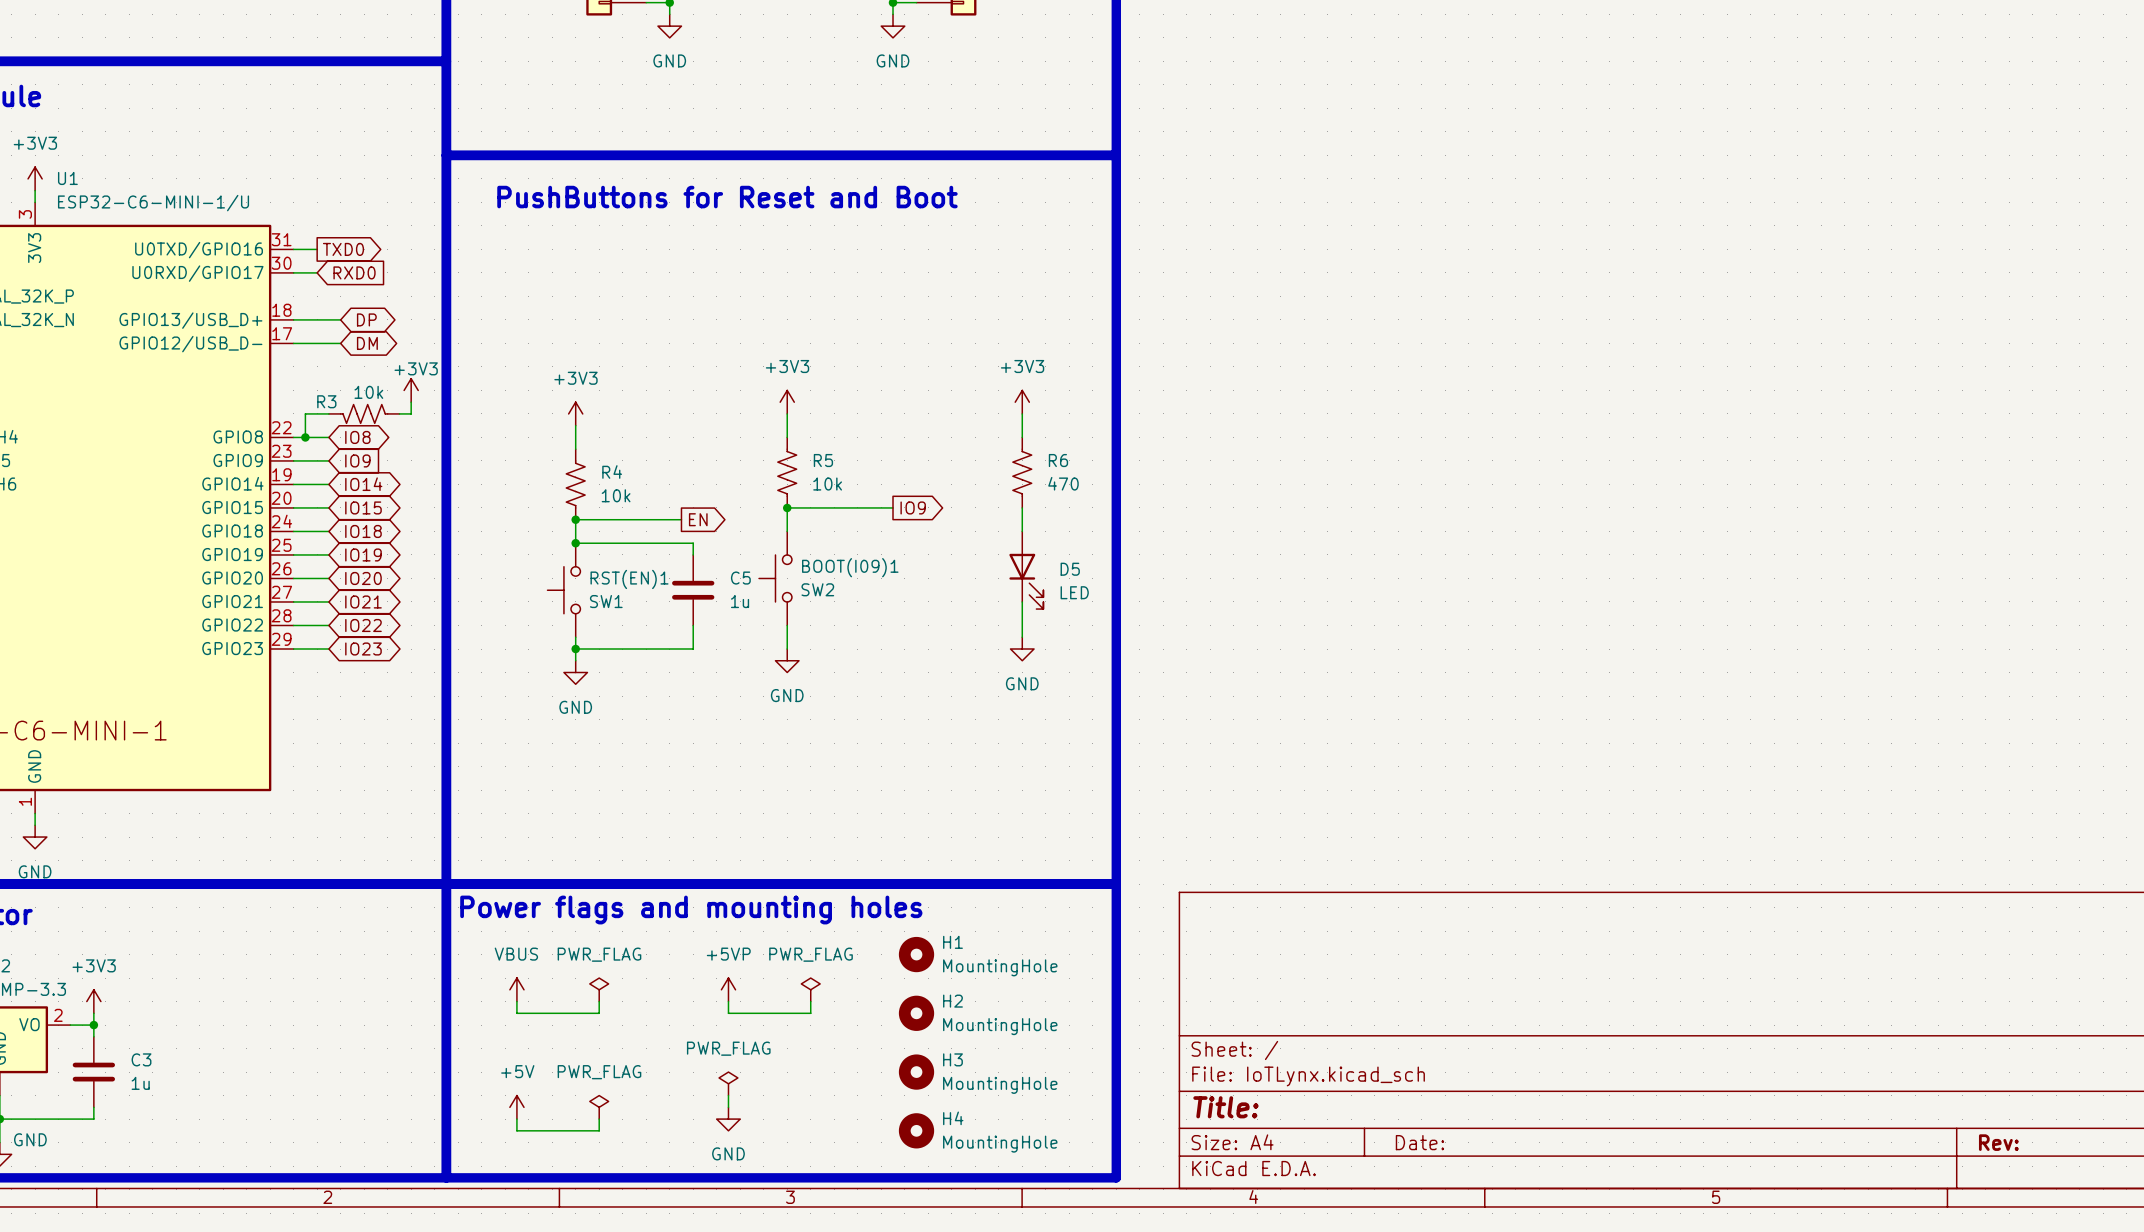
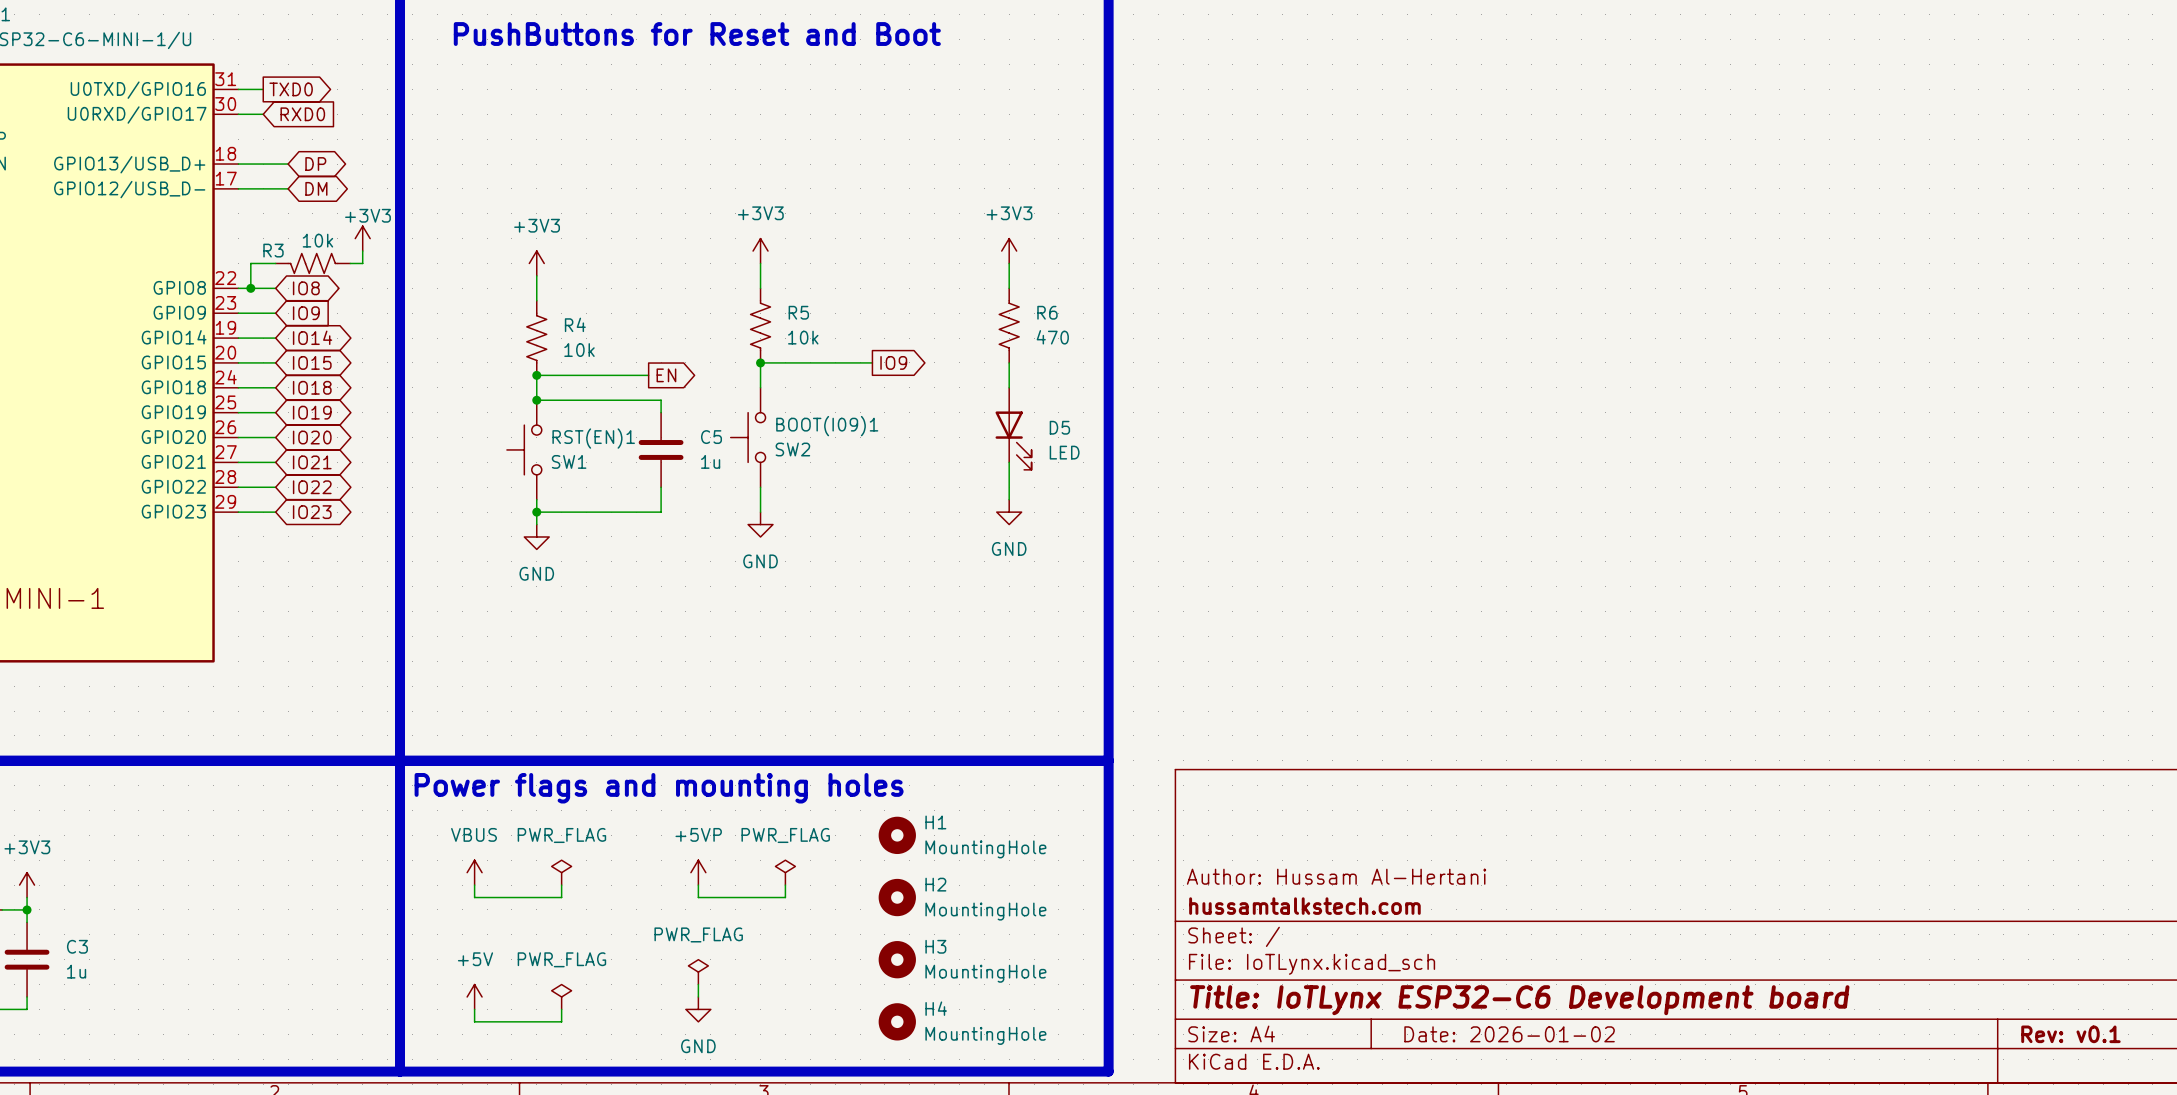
title block: none -> Author: Hussam Al-Hertani (1336, 876)
title block: none -> hussamtalkstech.com (1304, 906)
title block: Title: (1225, 1107) -> Title: IoTLynx ESP32-C6 Development board (1519, 1000)
title block: Date: (1419, 1142) -> Date: 2026-01-02 (1509, 1034)
title block: Rev: (1998, 1142) -> Rev: v0.1 (2070, 1034)

